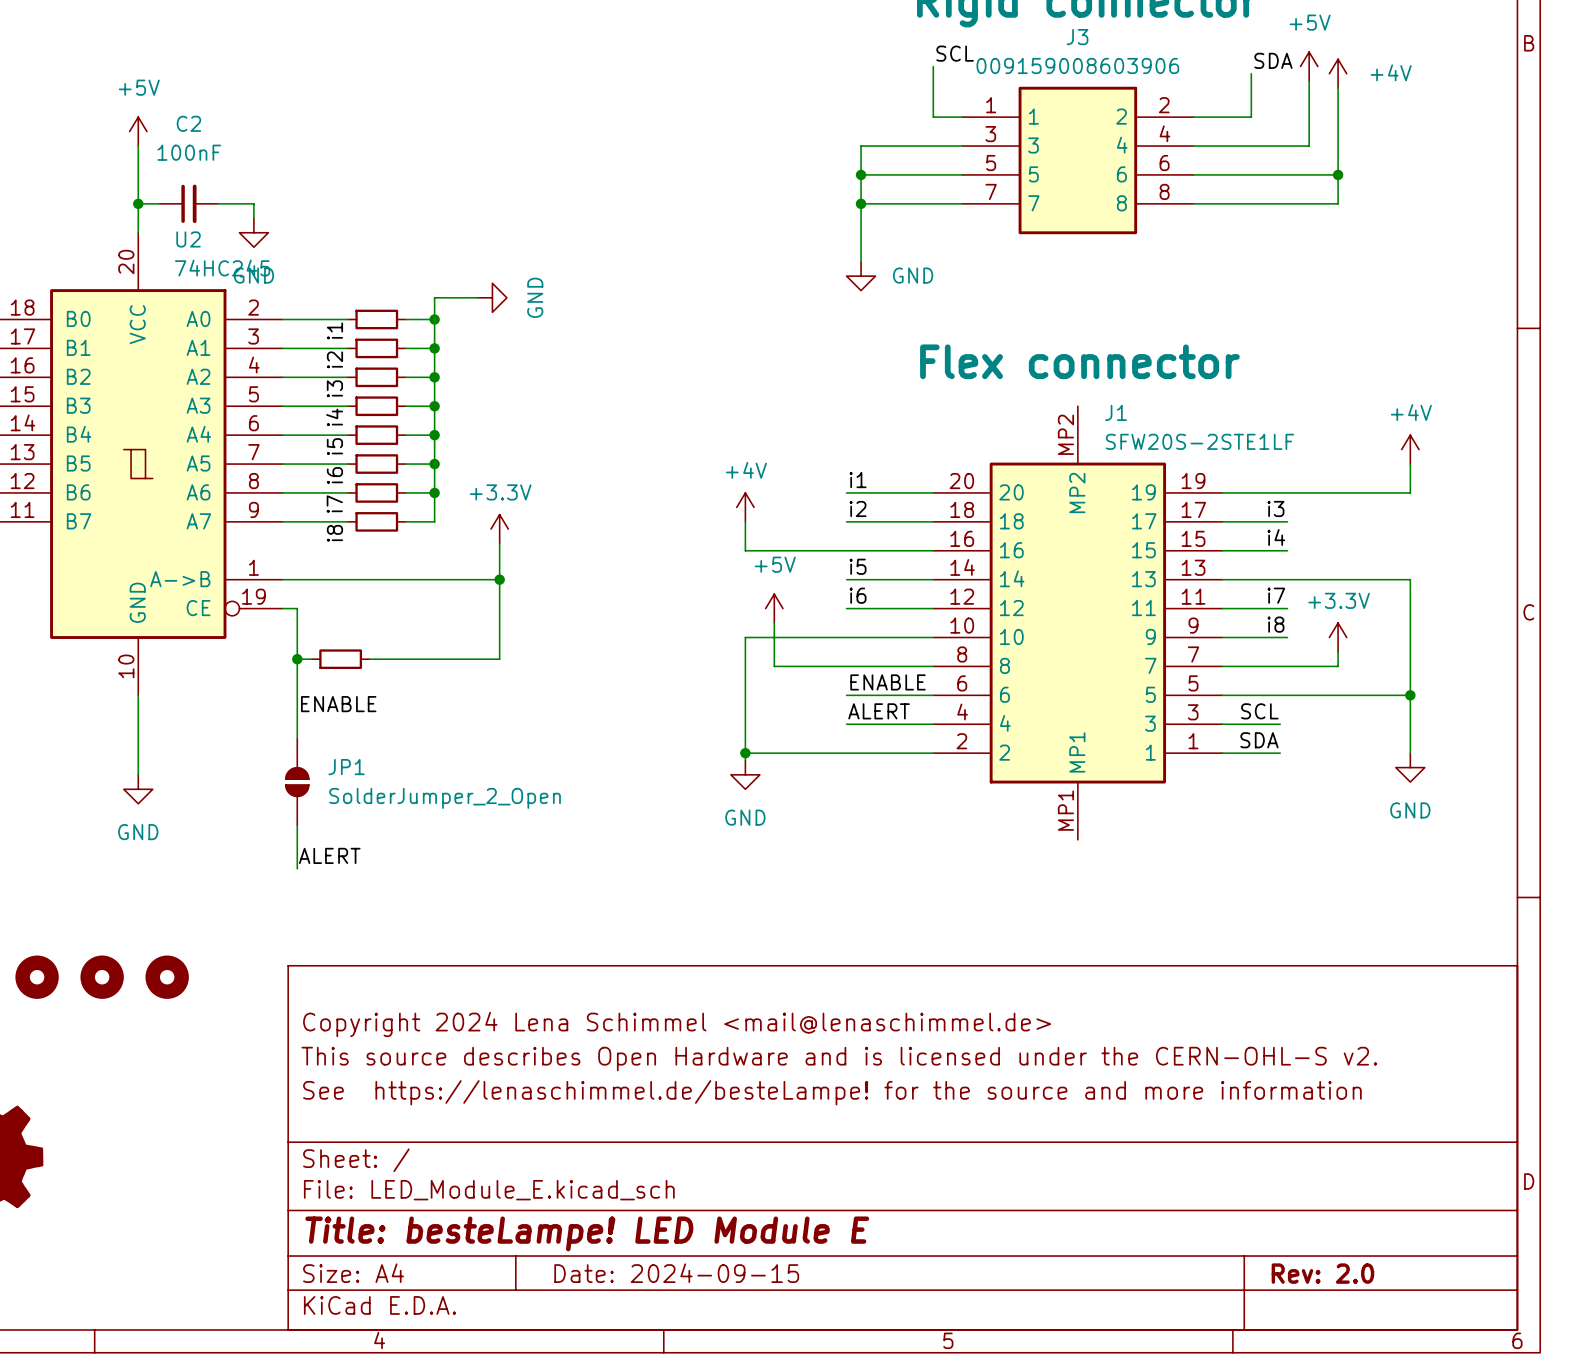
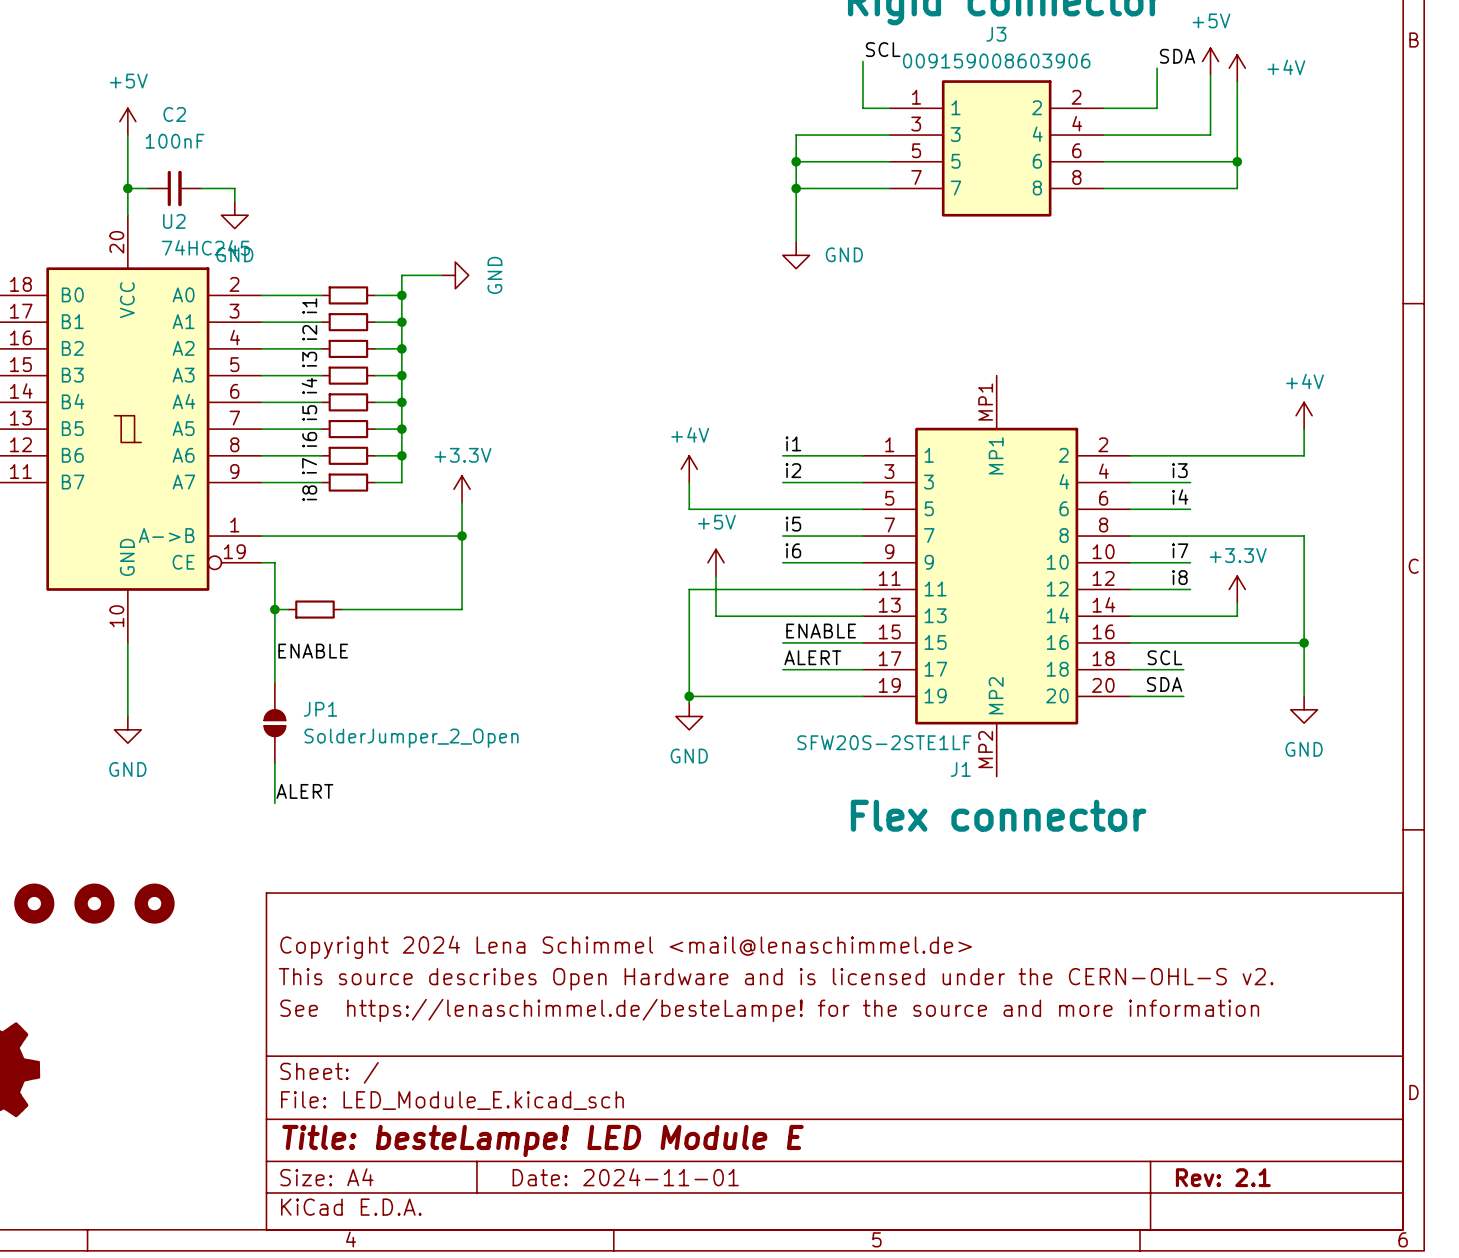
J1 rotation: 0° (1077, 623) -> 180° (996, 576)
title block: Date: 2024-09-15 (676, 1273) -> Date: 2024-11-01 (625, 1177)
title block: Rev: 2.0 (1322, 1273) -> Rev: 2.1 (1223, 1177)

